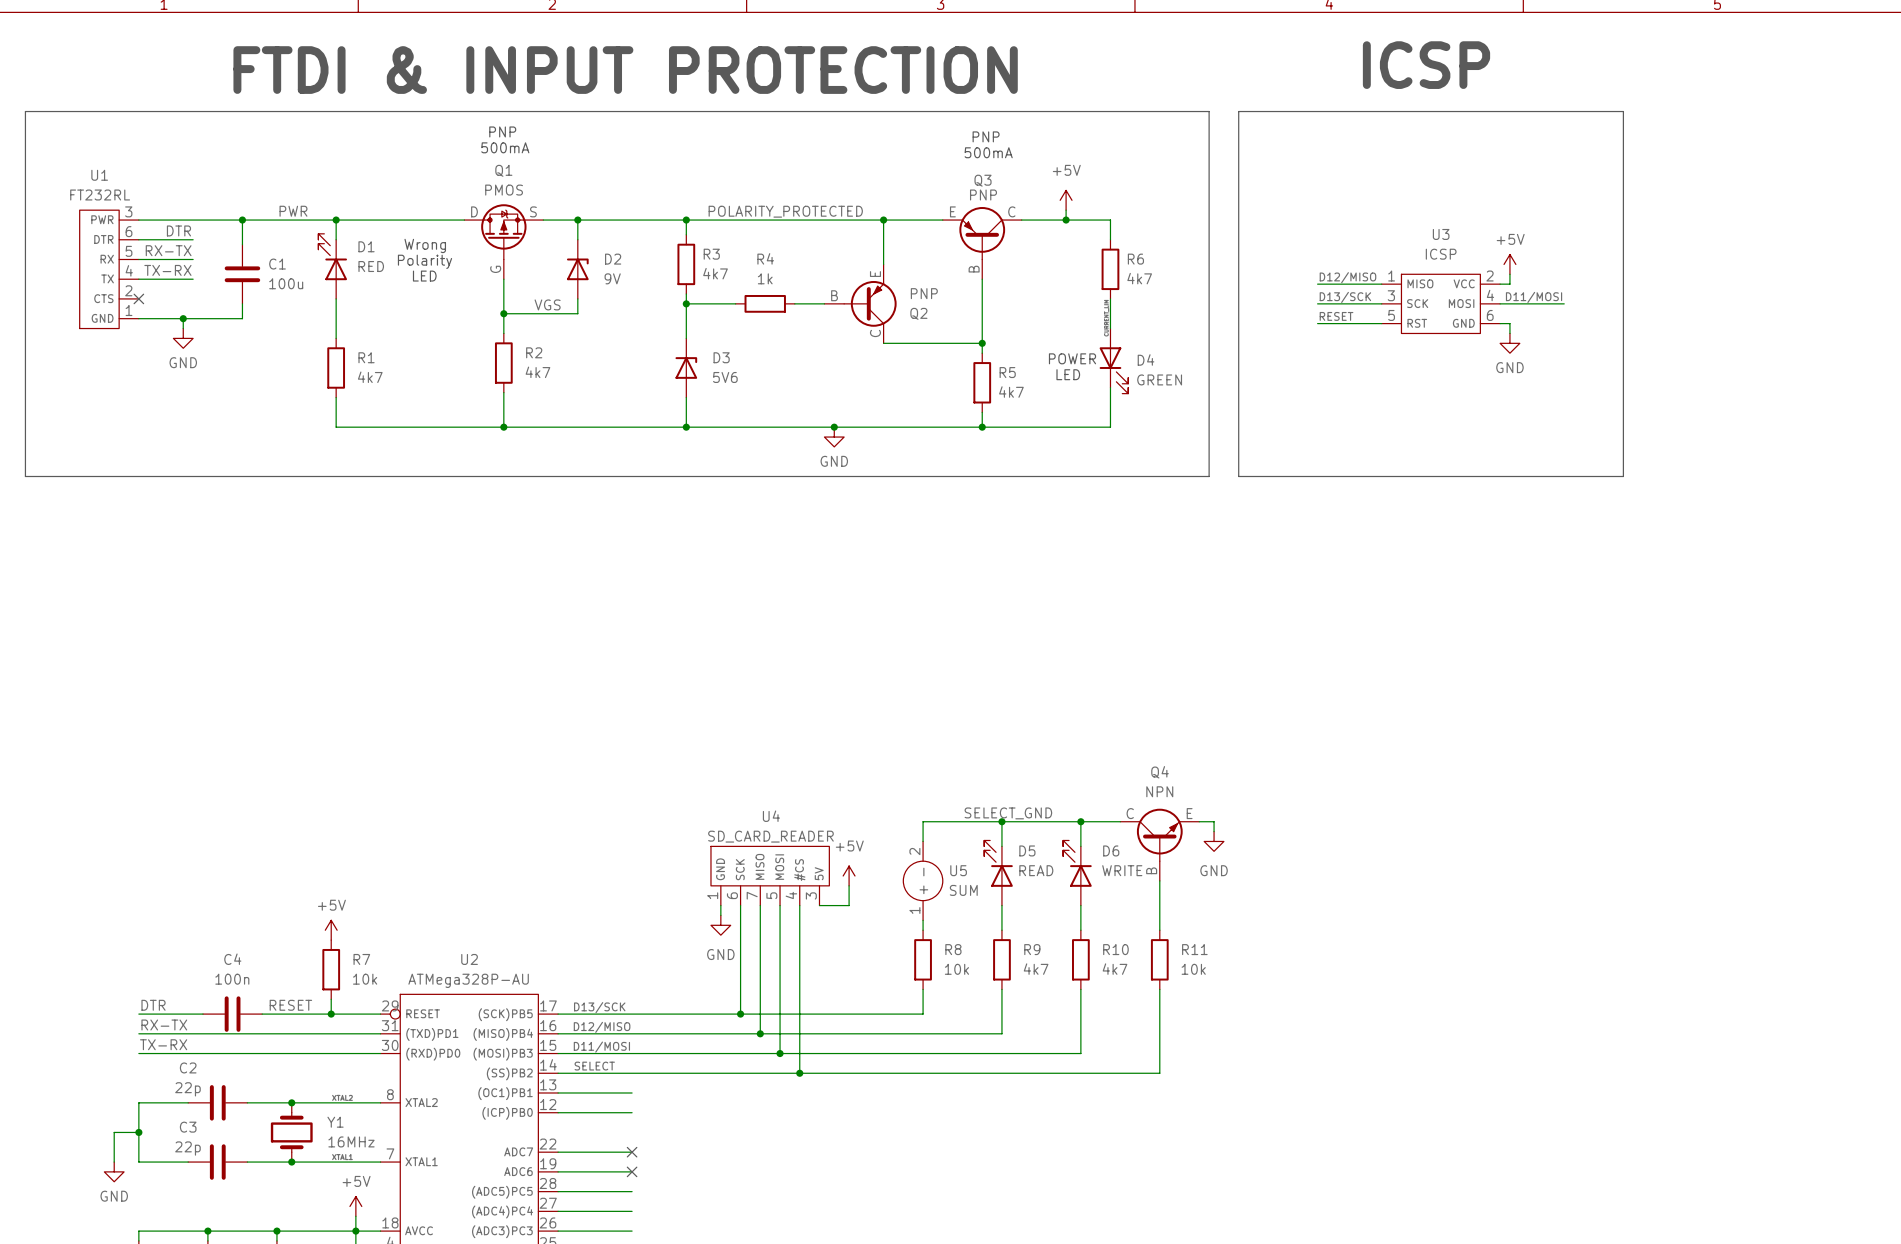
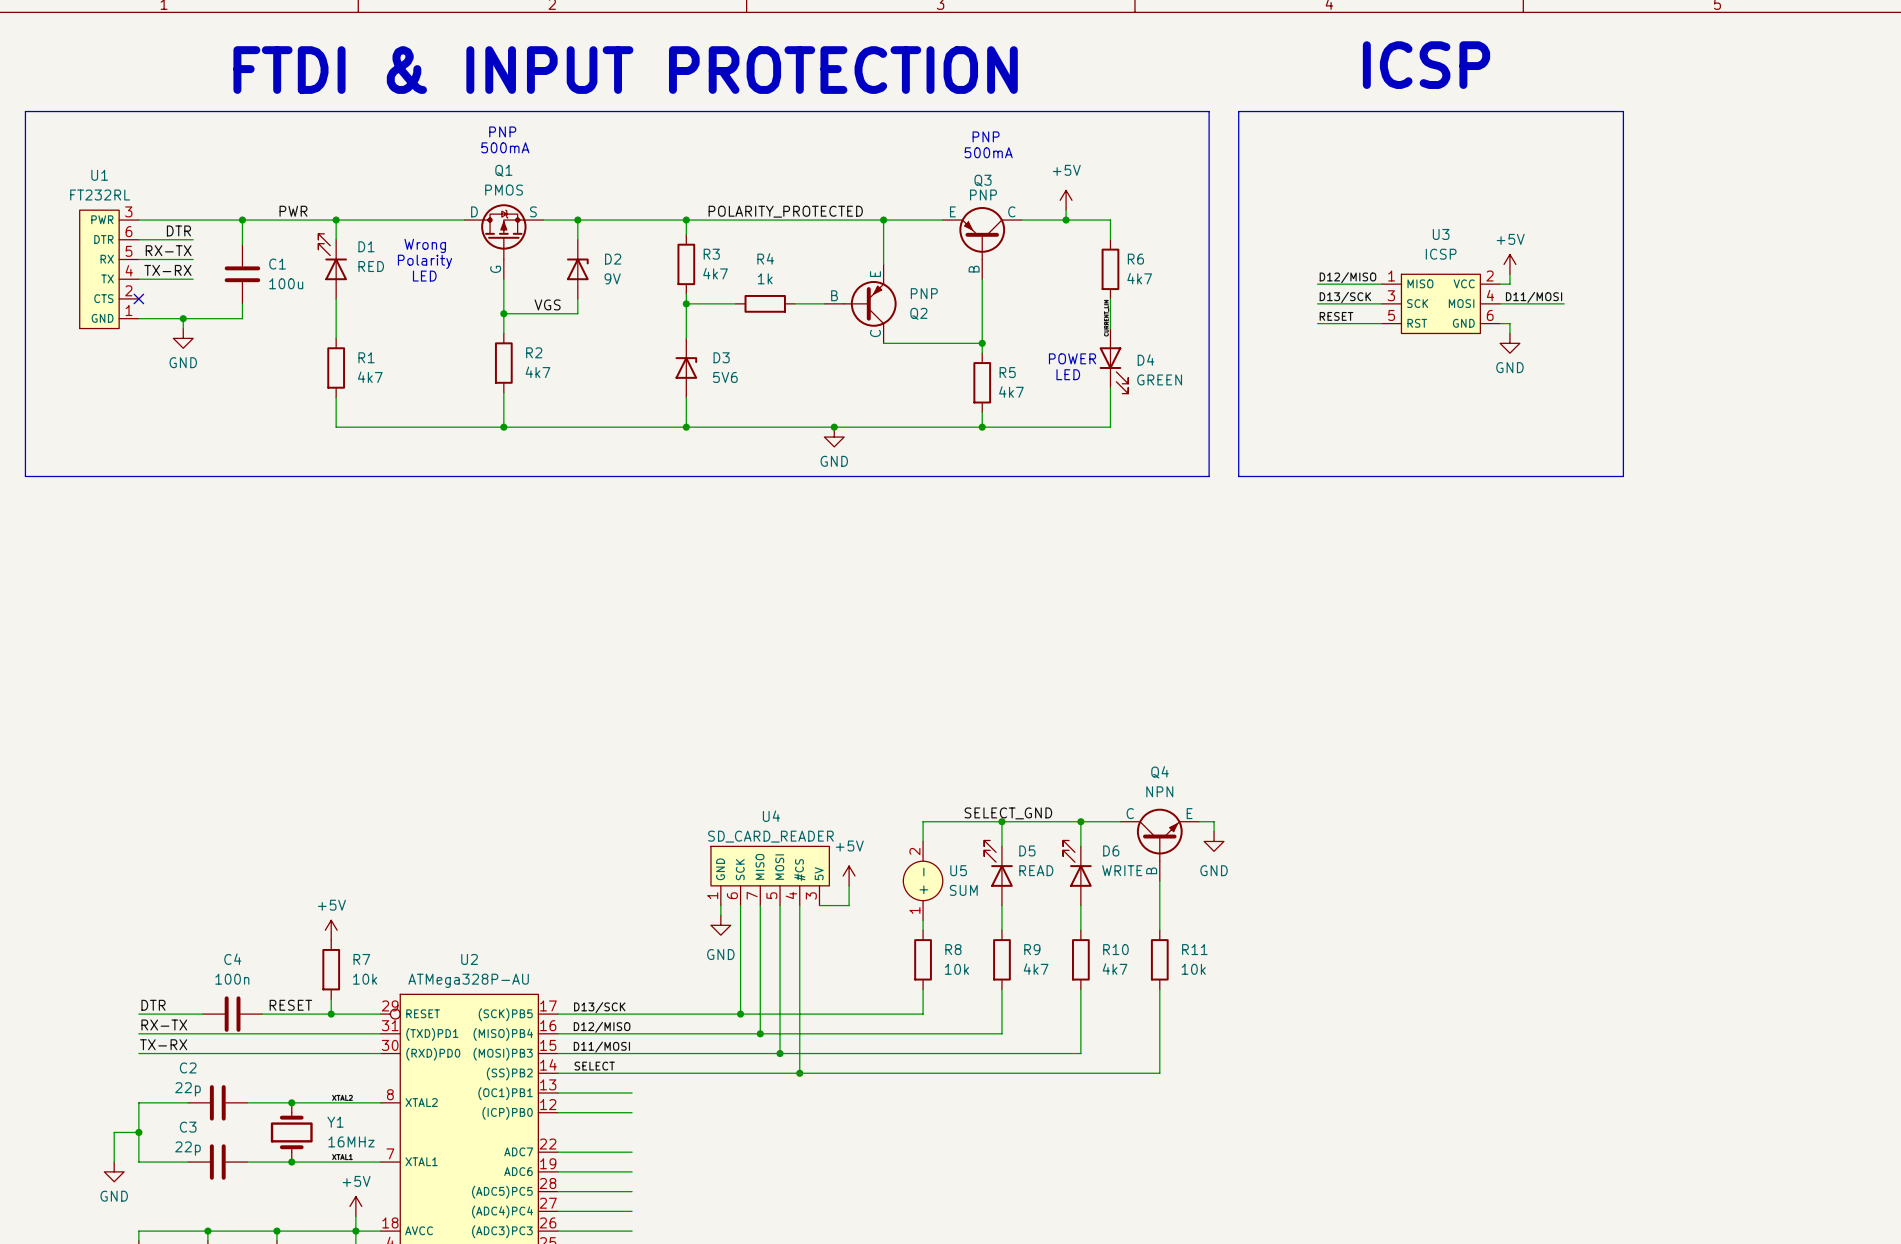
no-connect mark: (632, 1152) -> none
no-connect mark: (632, 1171) -> none

